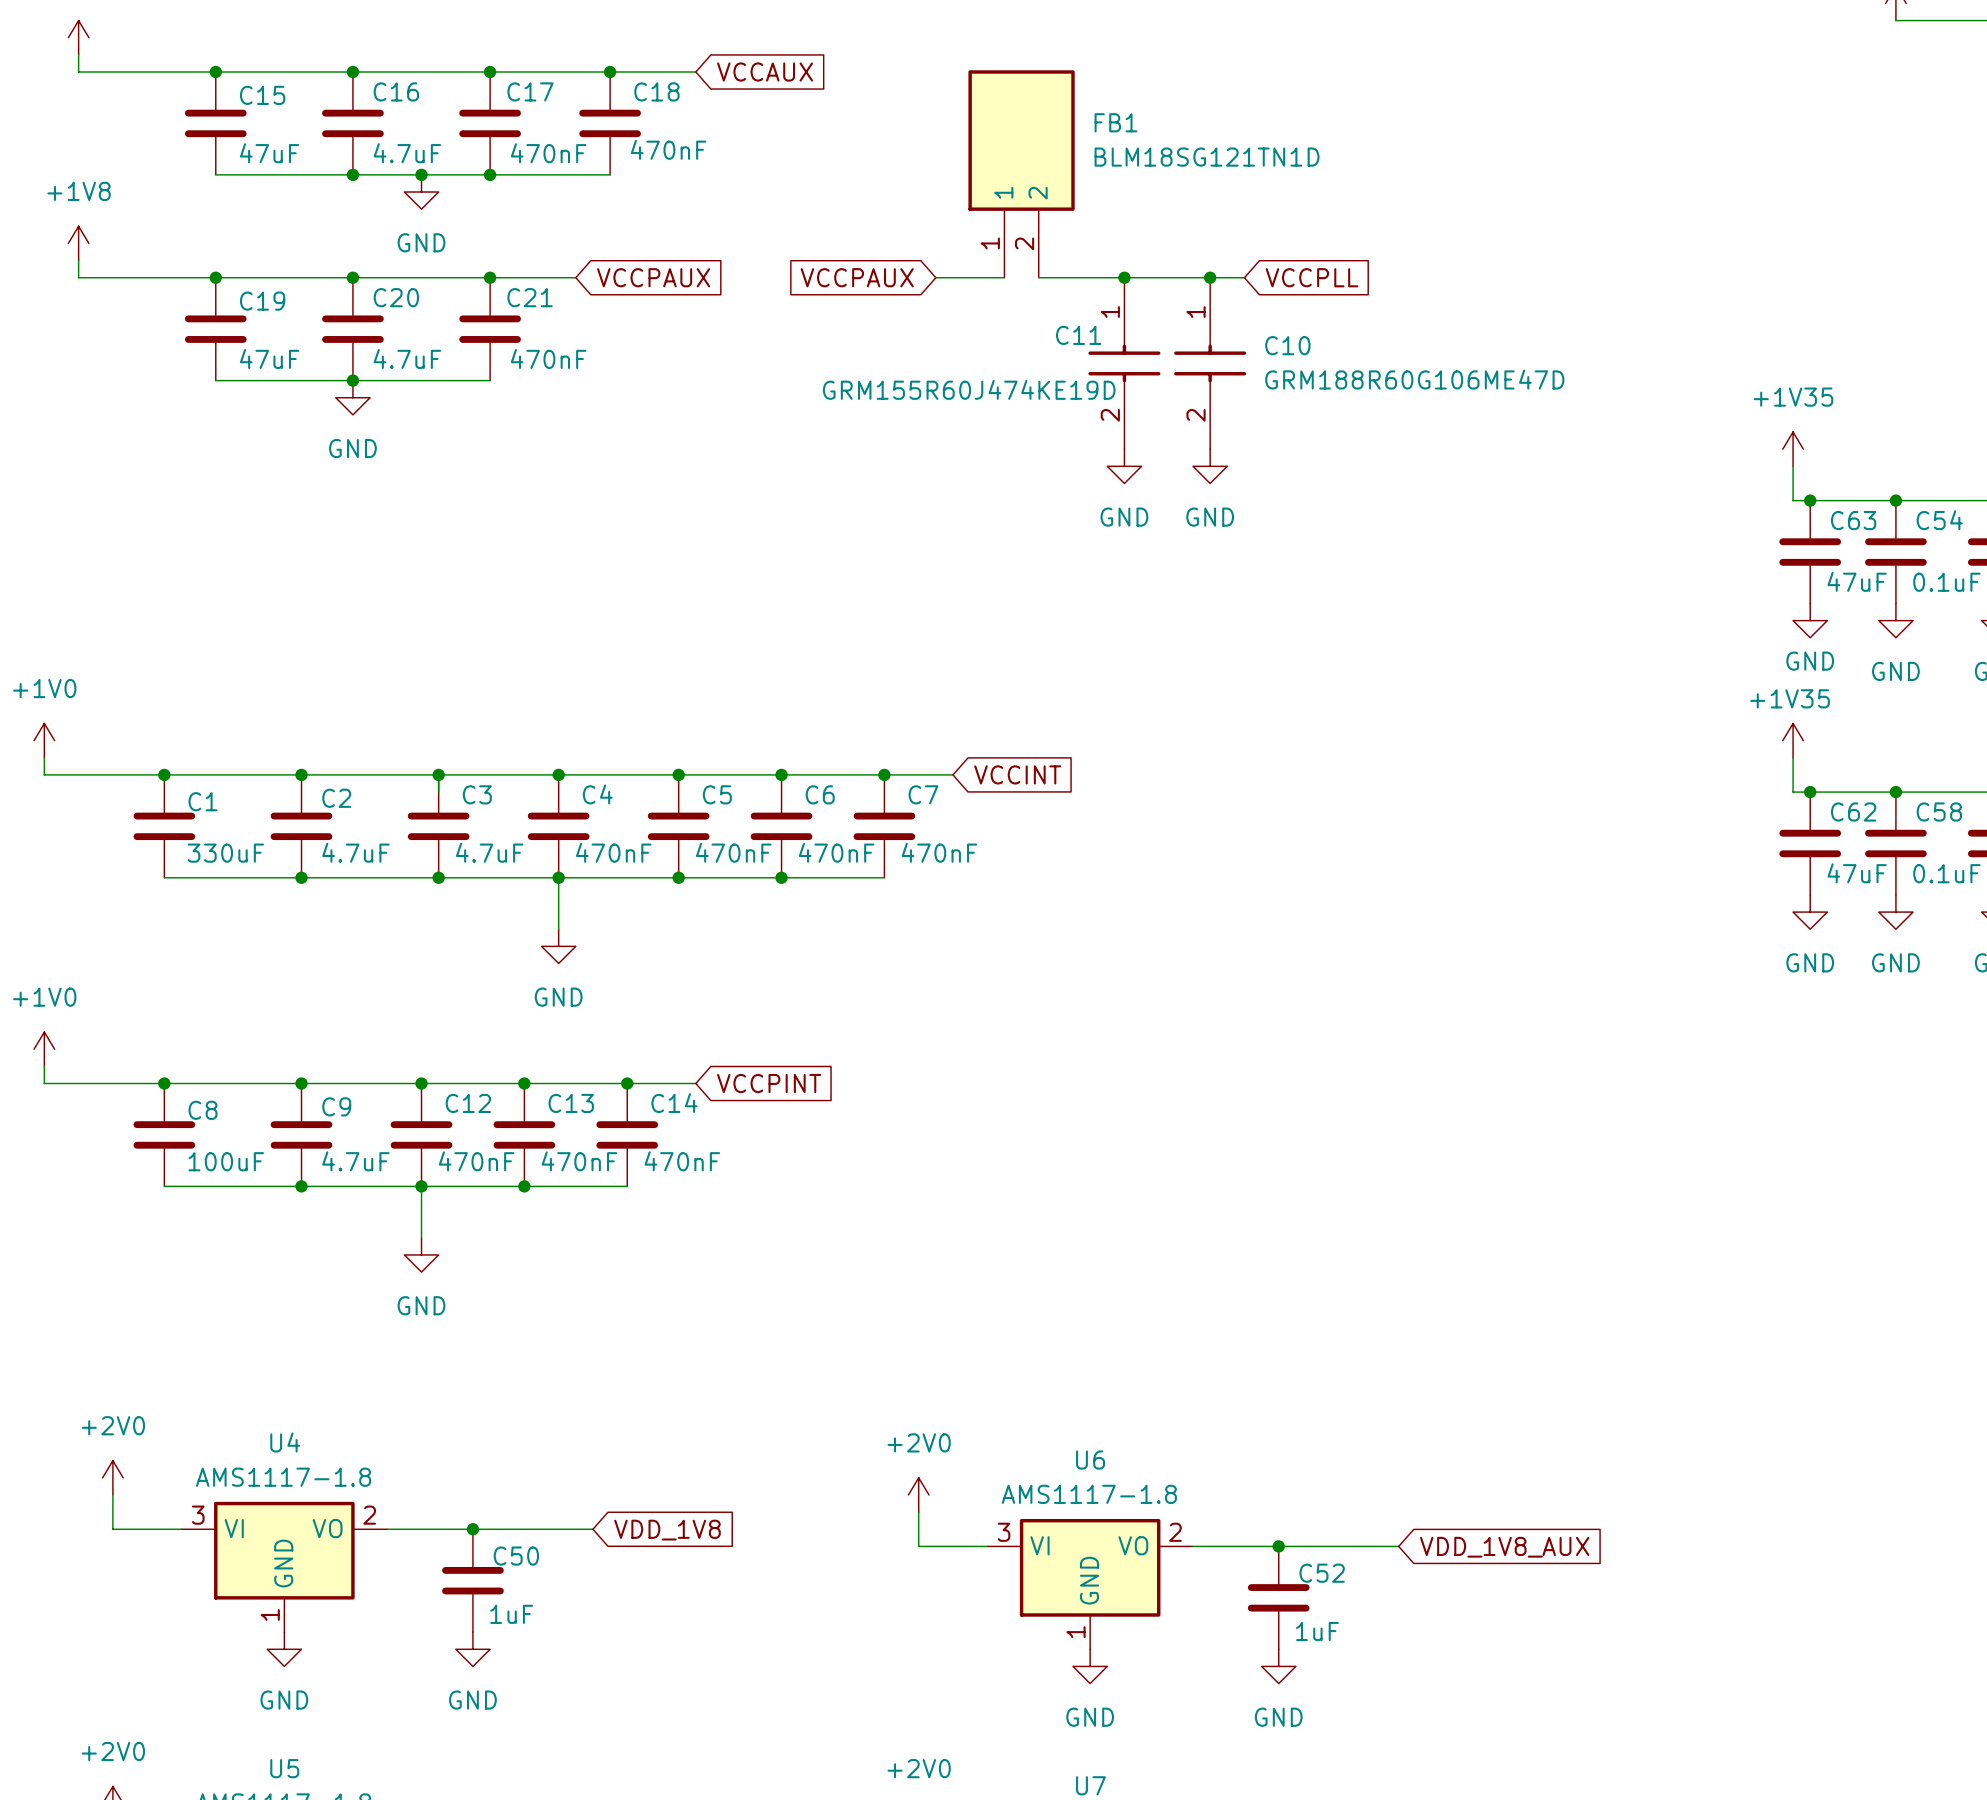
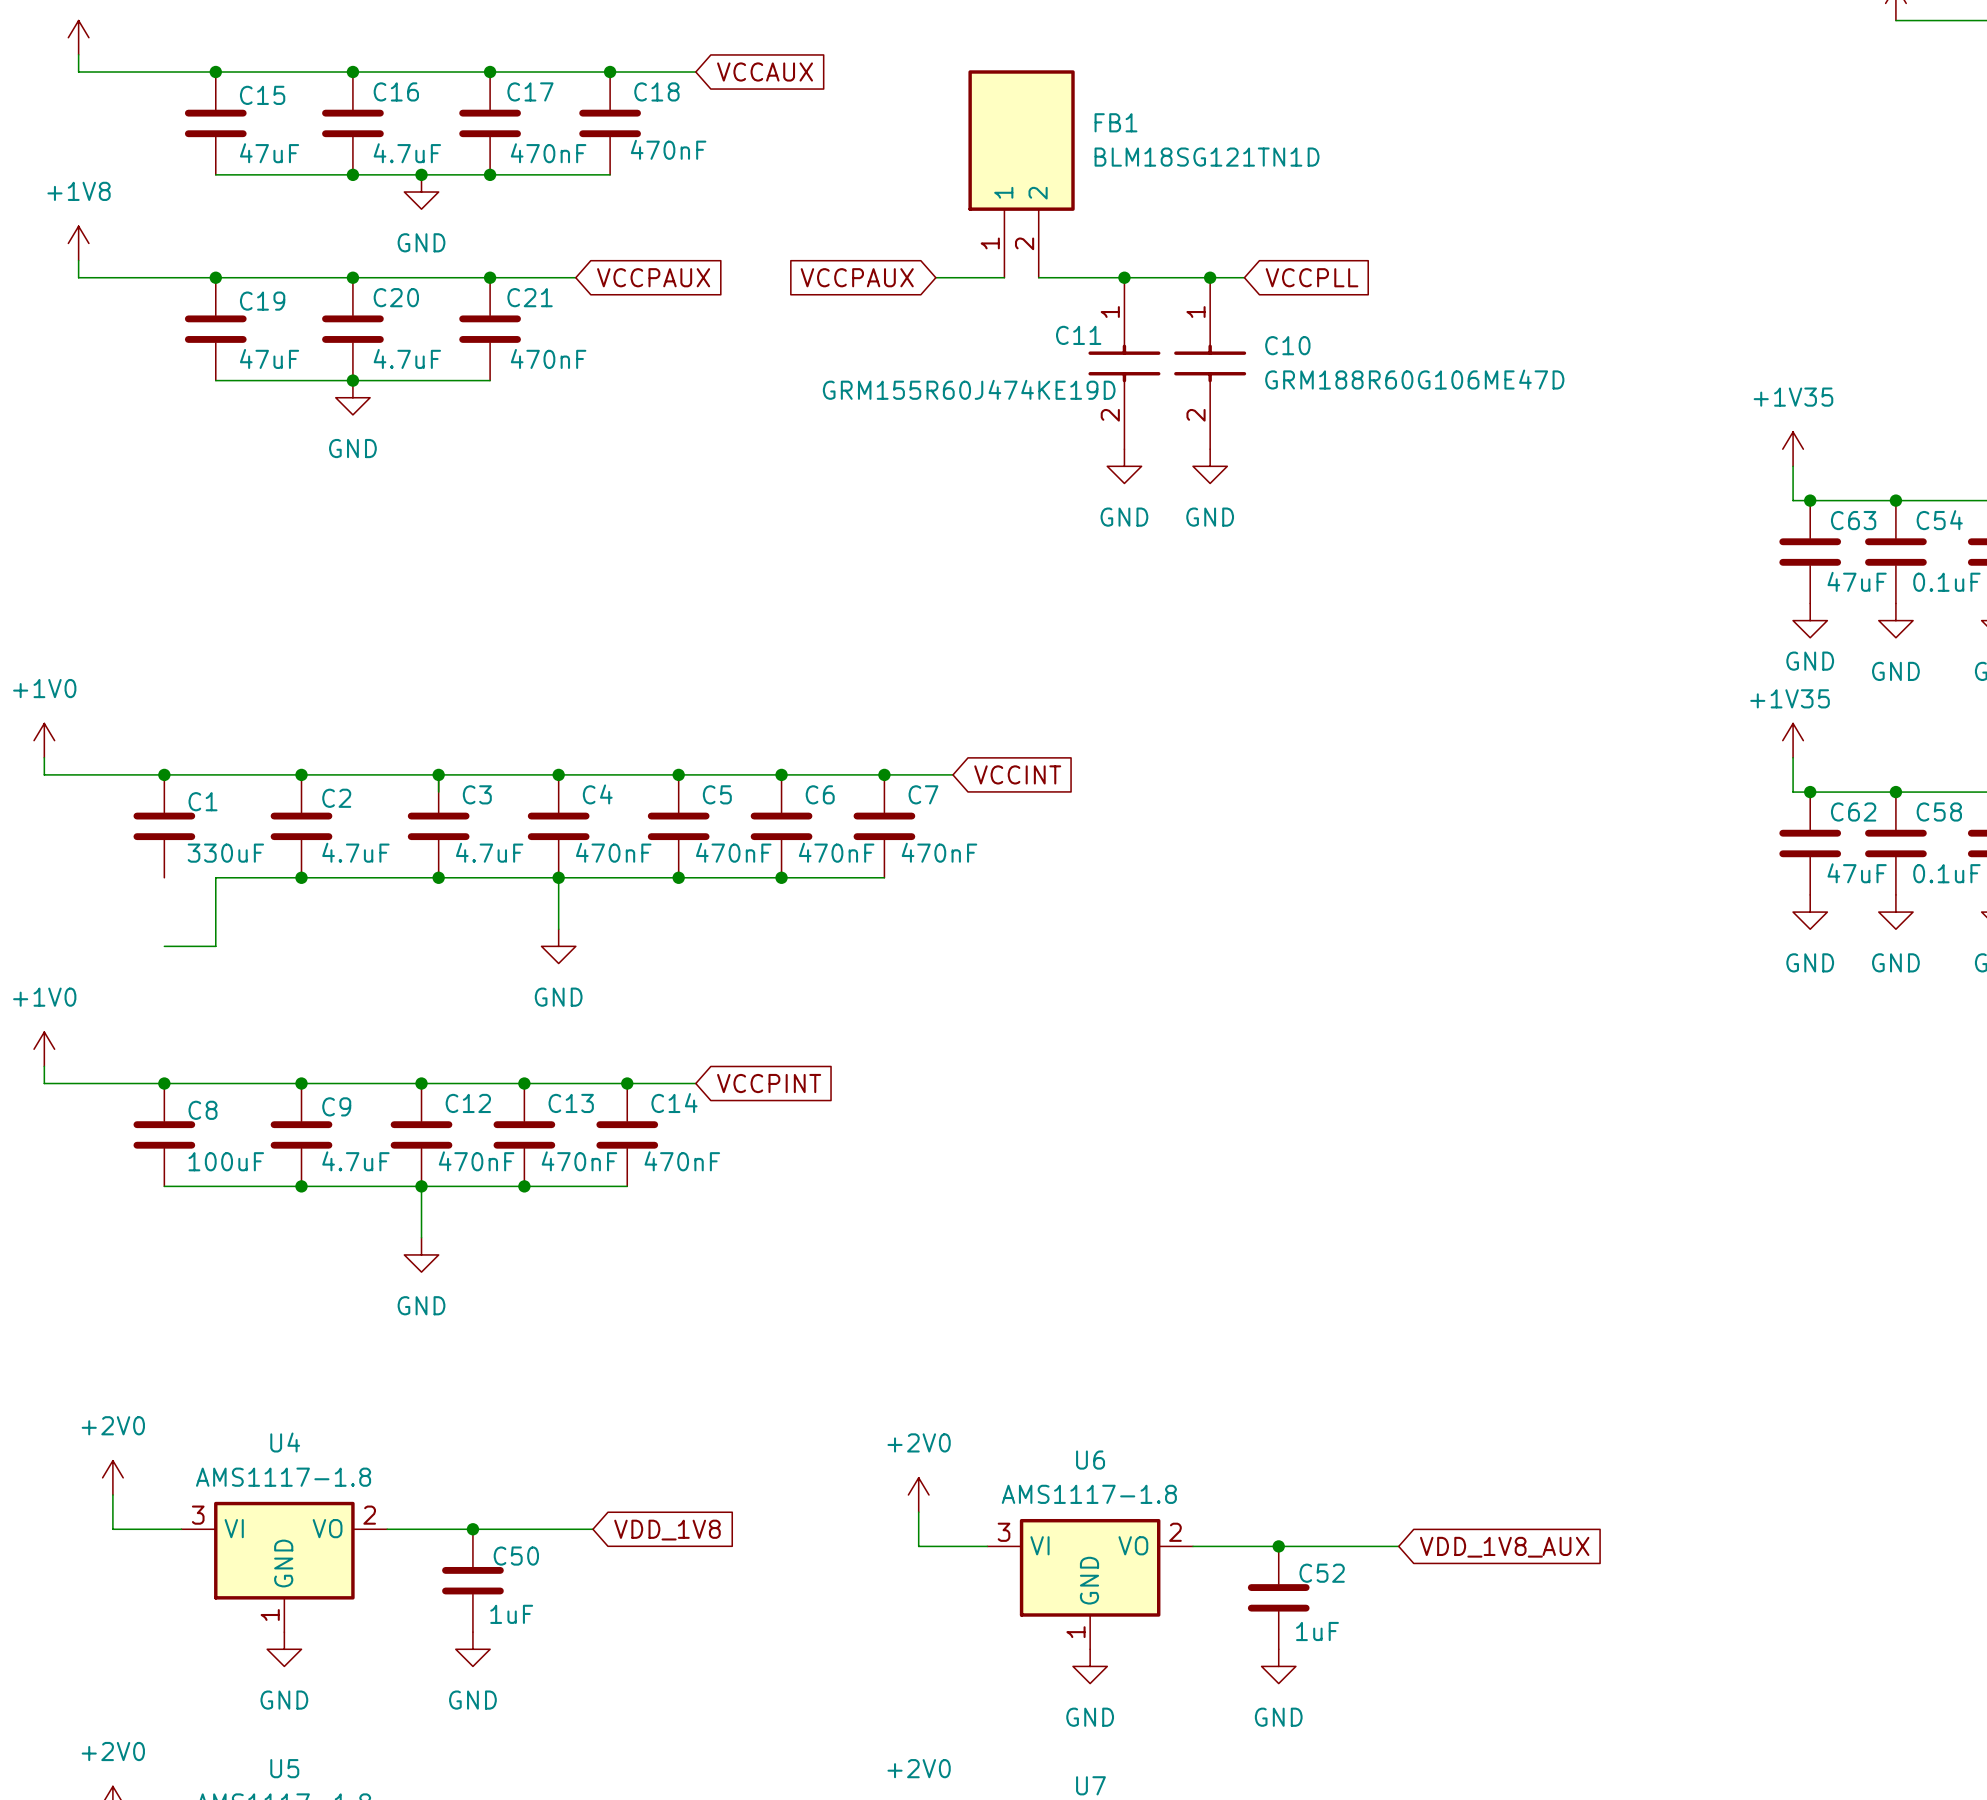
wire: (164, 877) (215, 877) -> (164, 946) (215, 946) (215, 877)

